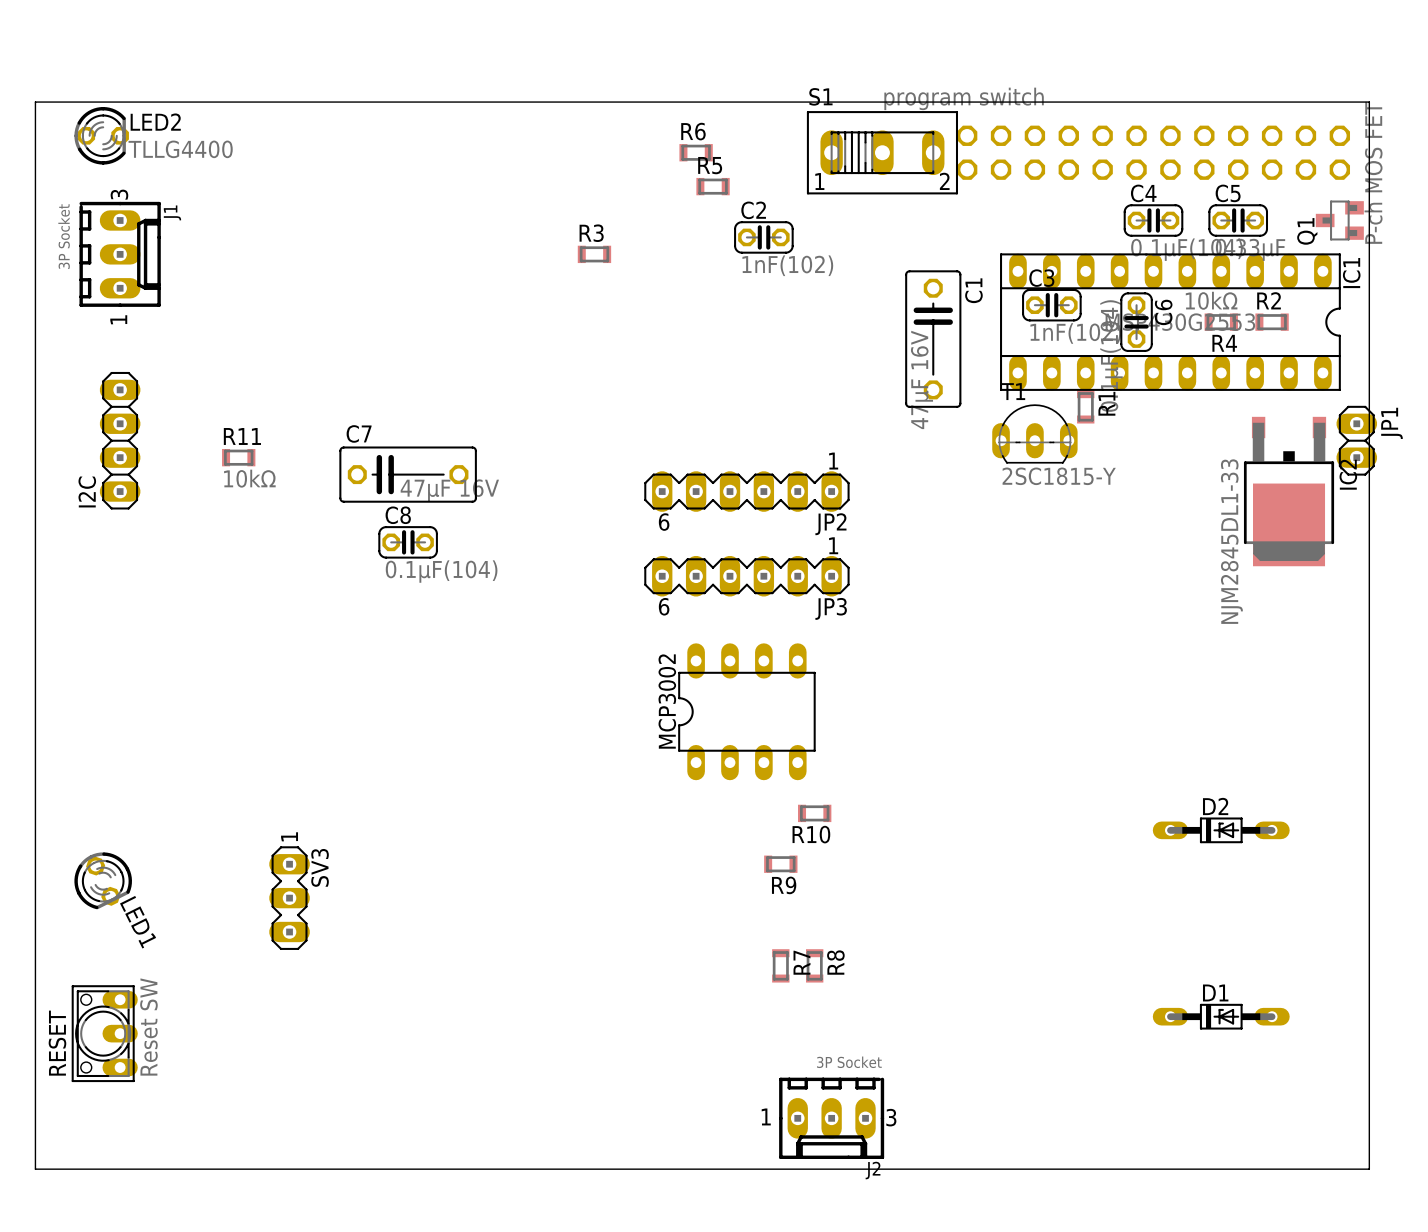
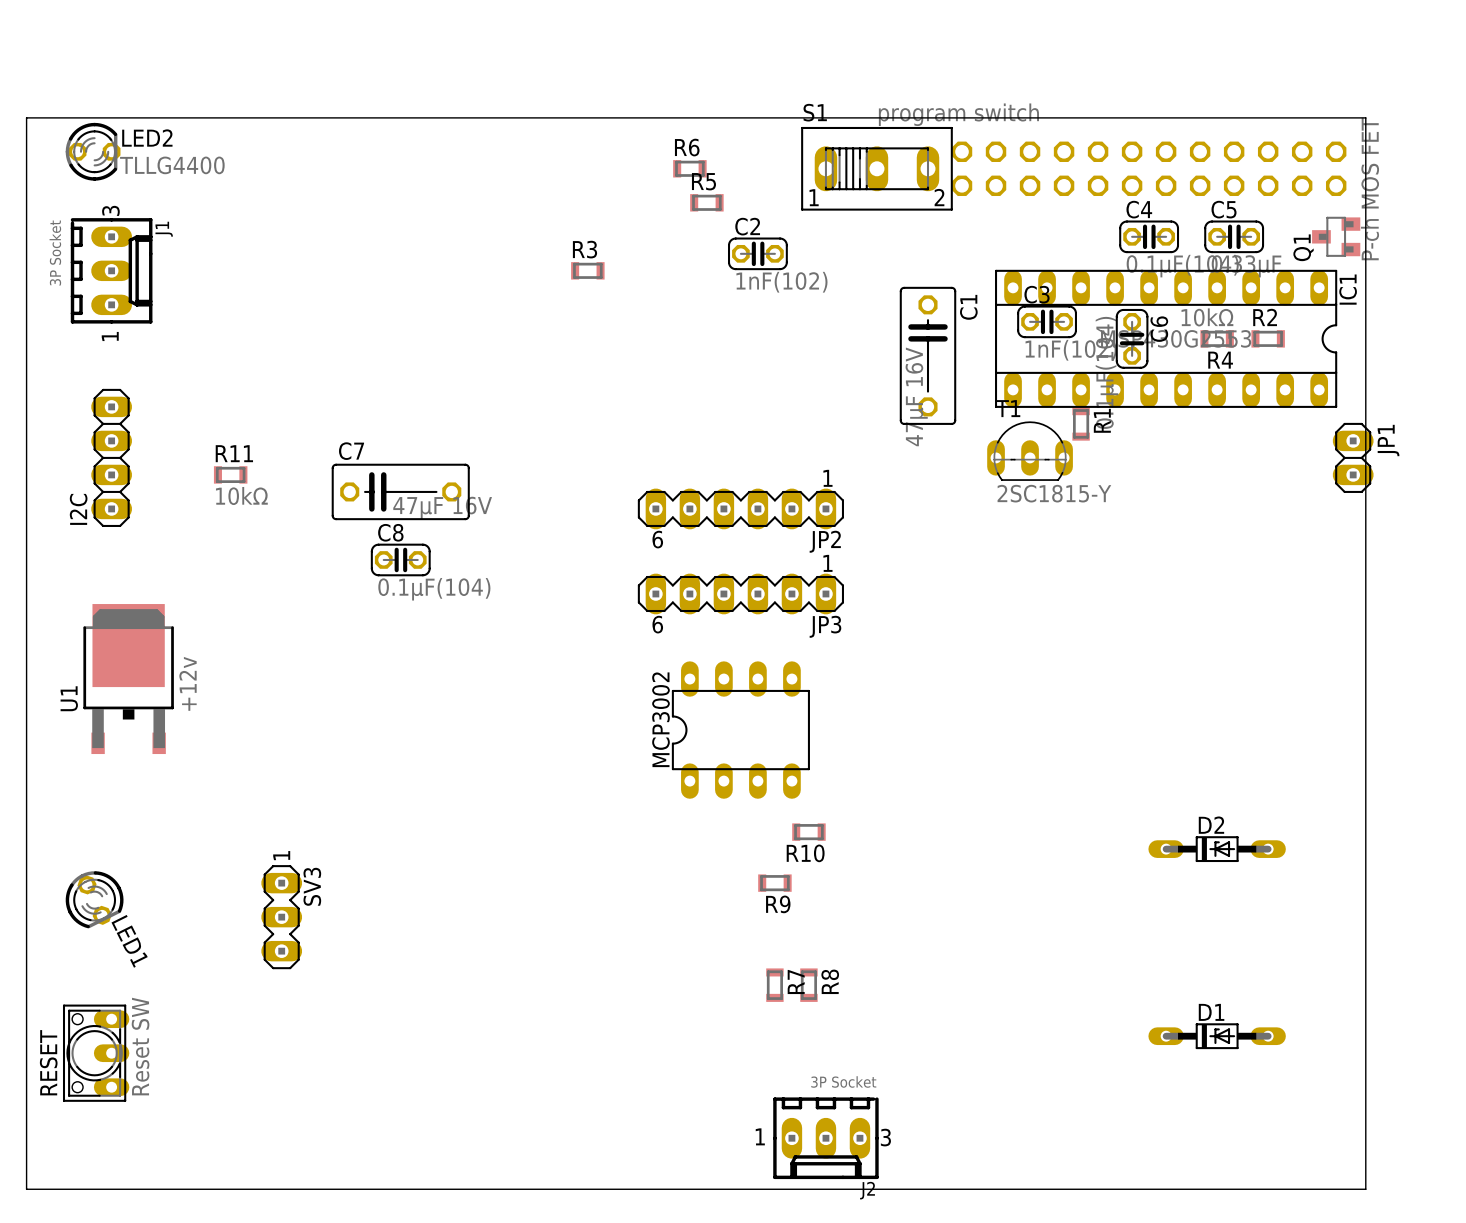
IC2: NJM2845DL1-33 (1289, 491) -> none
U1: none -> +12v (128, 679)

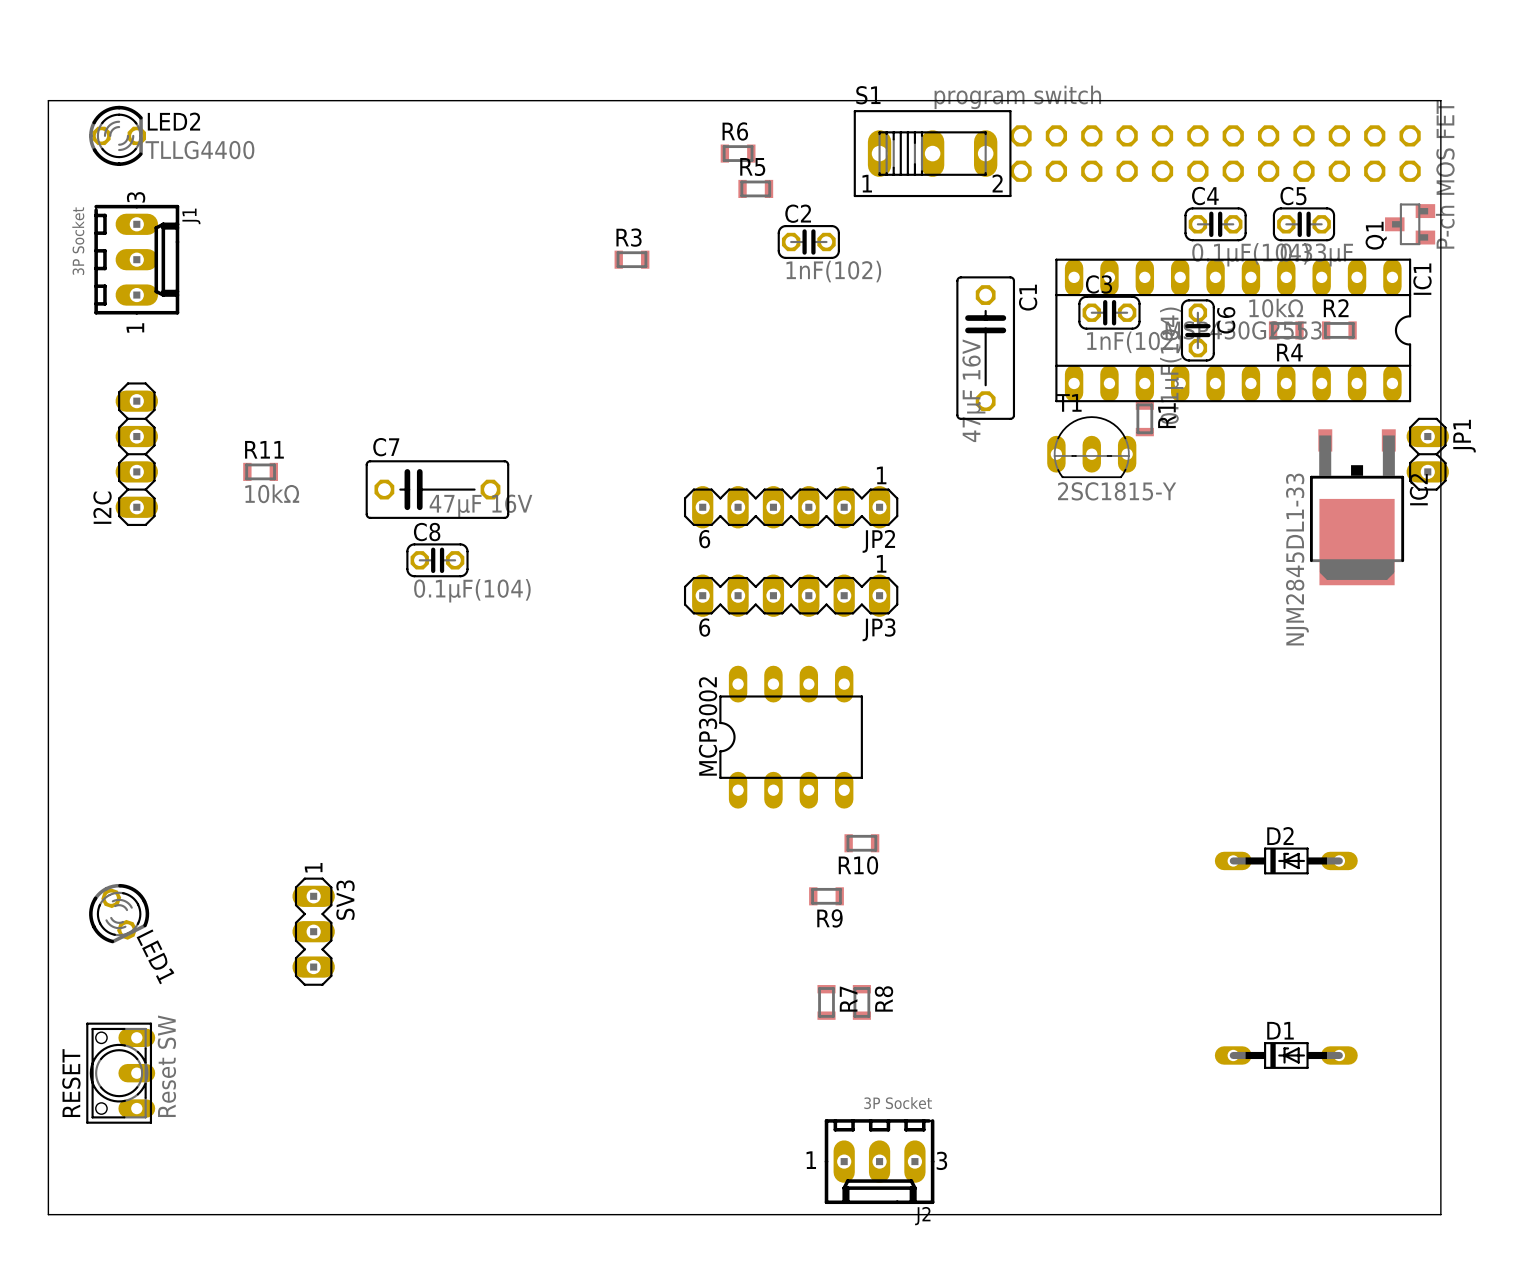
IC2: none -> NJM2845DL1-33 (1357, 507)
U1: +12v (128, 679) -> none

